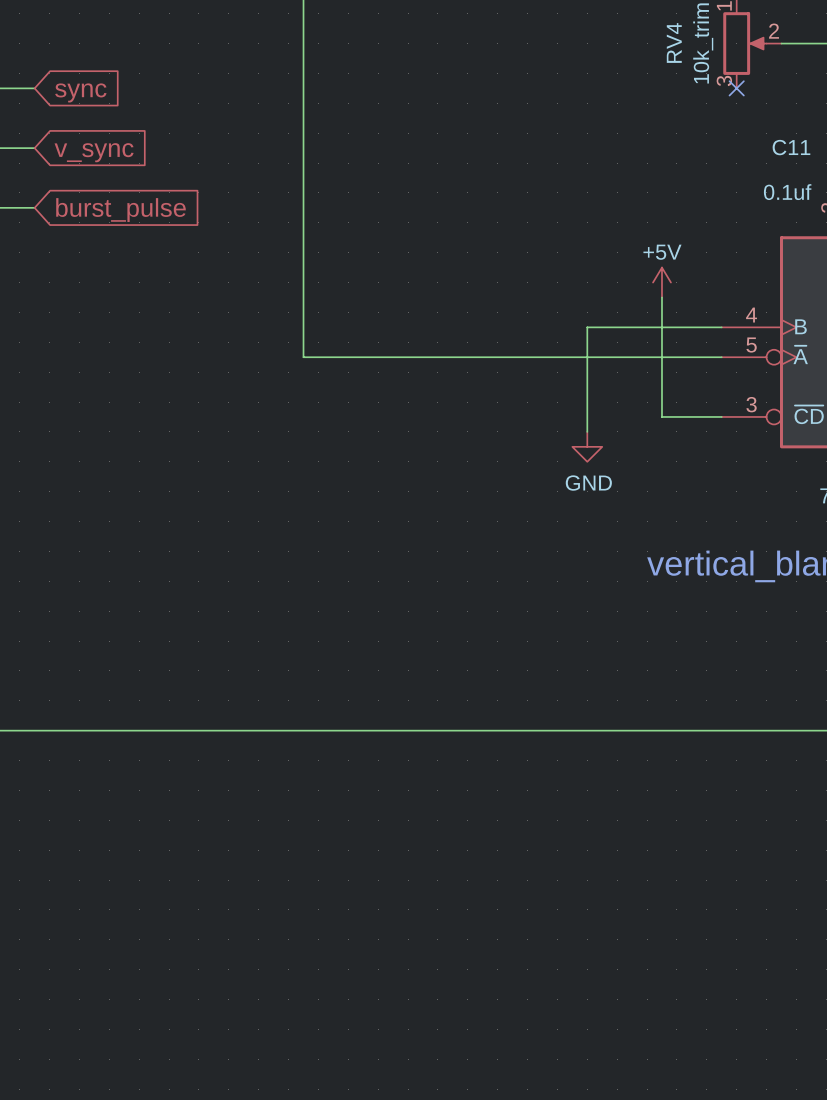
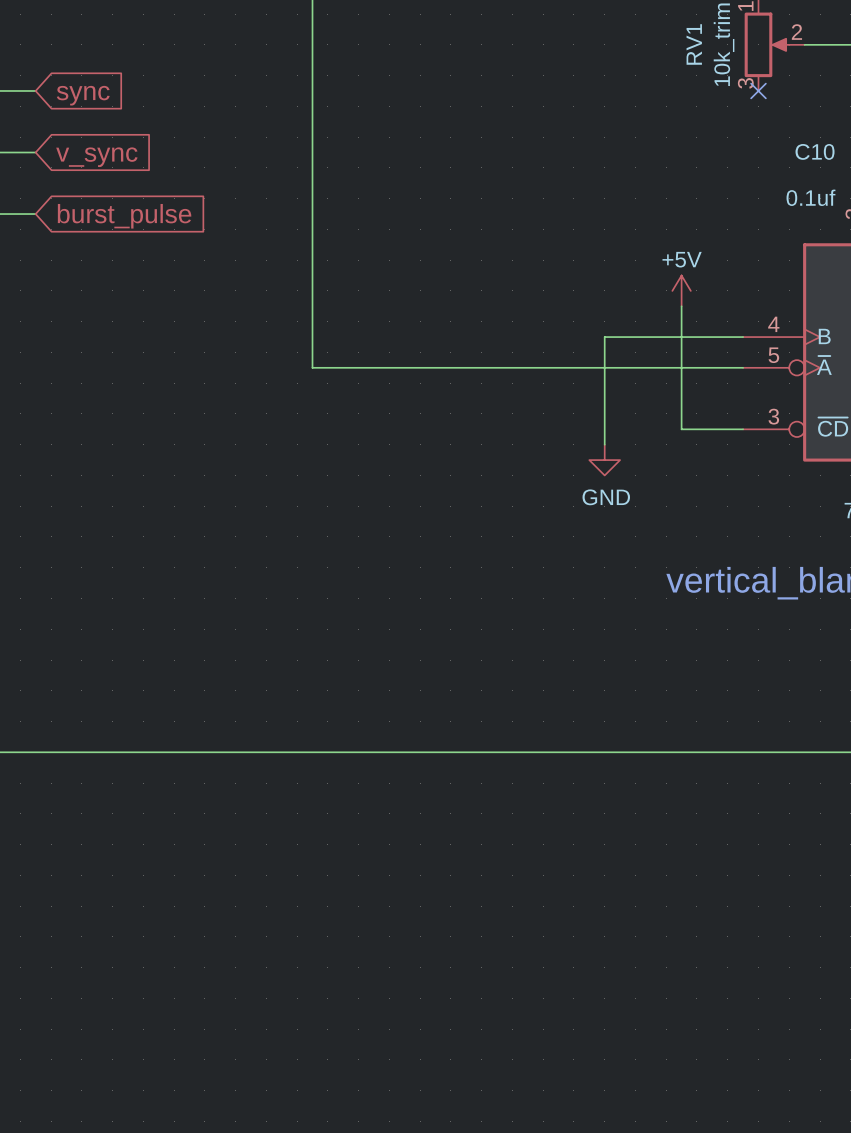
RV4 name: RV4 (674, 42) -> RV1 (694, 44)
C11 name: C11 (791, 147) -> C10 (815, 151)

